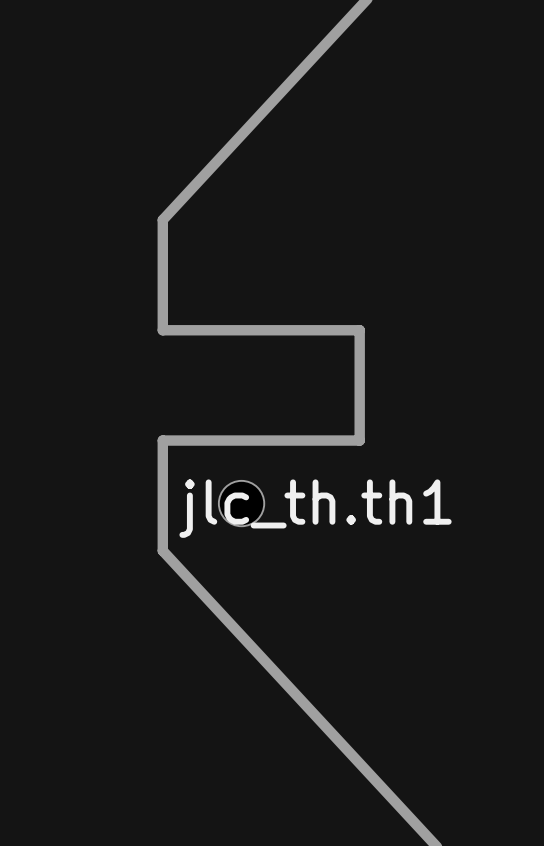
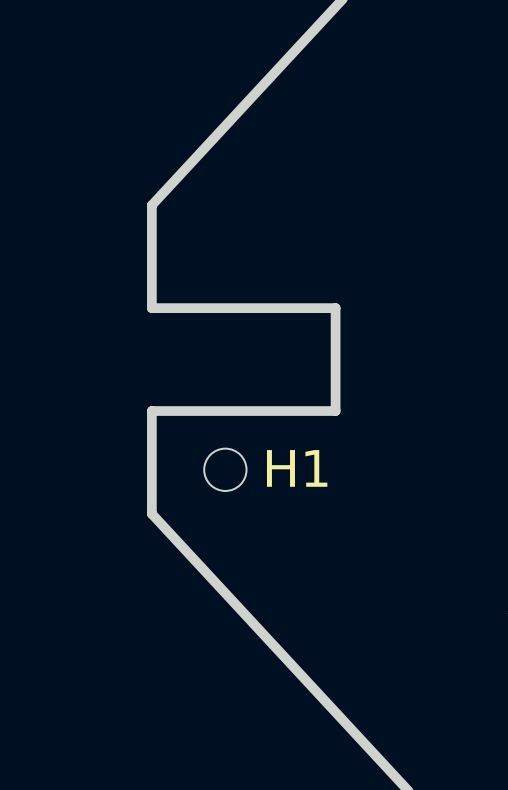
jlc_th.th1 name: jlc_th.th1 (315, 508) -> H1 (297, 468)

